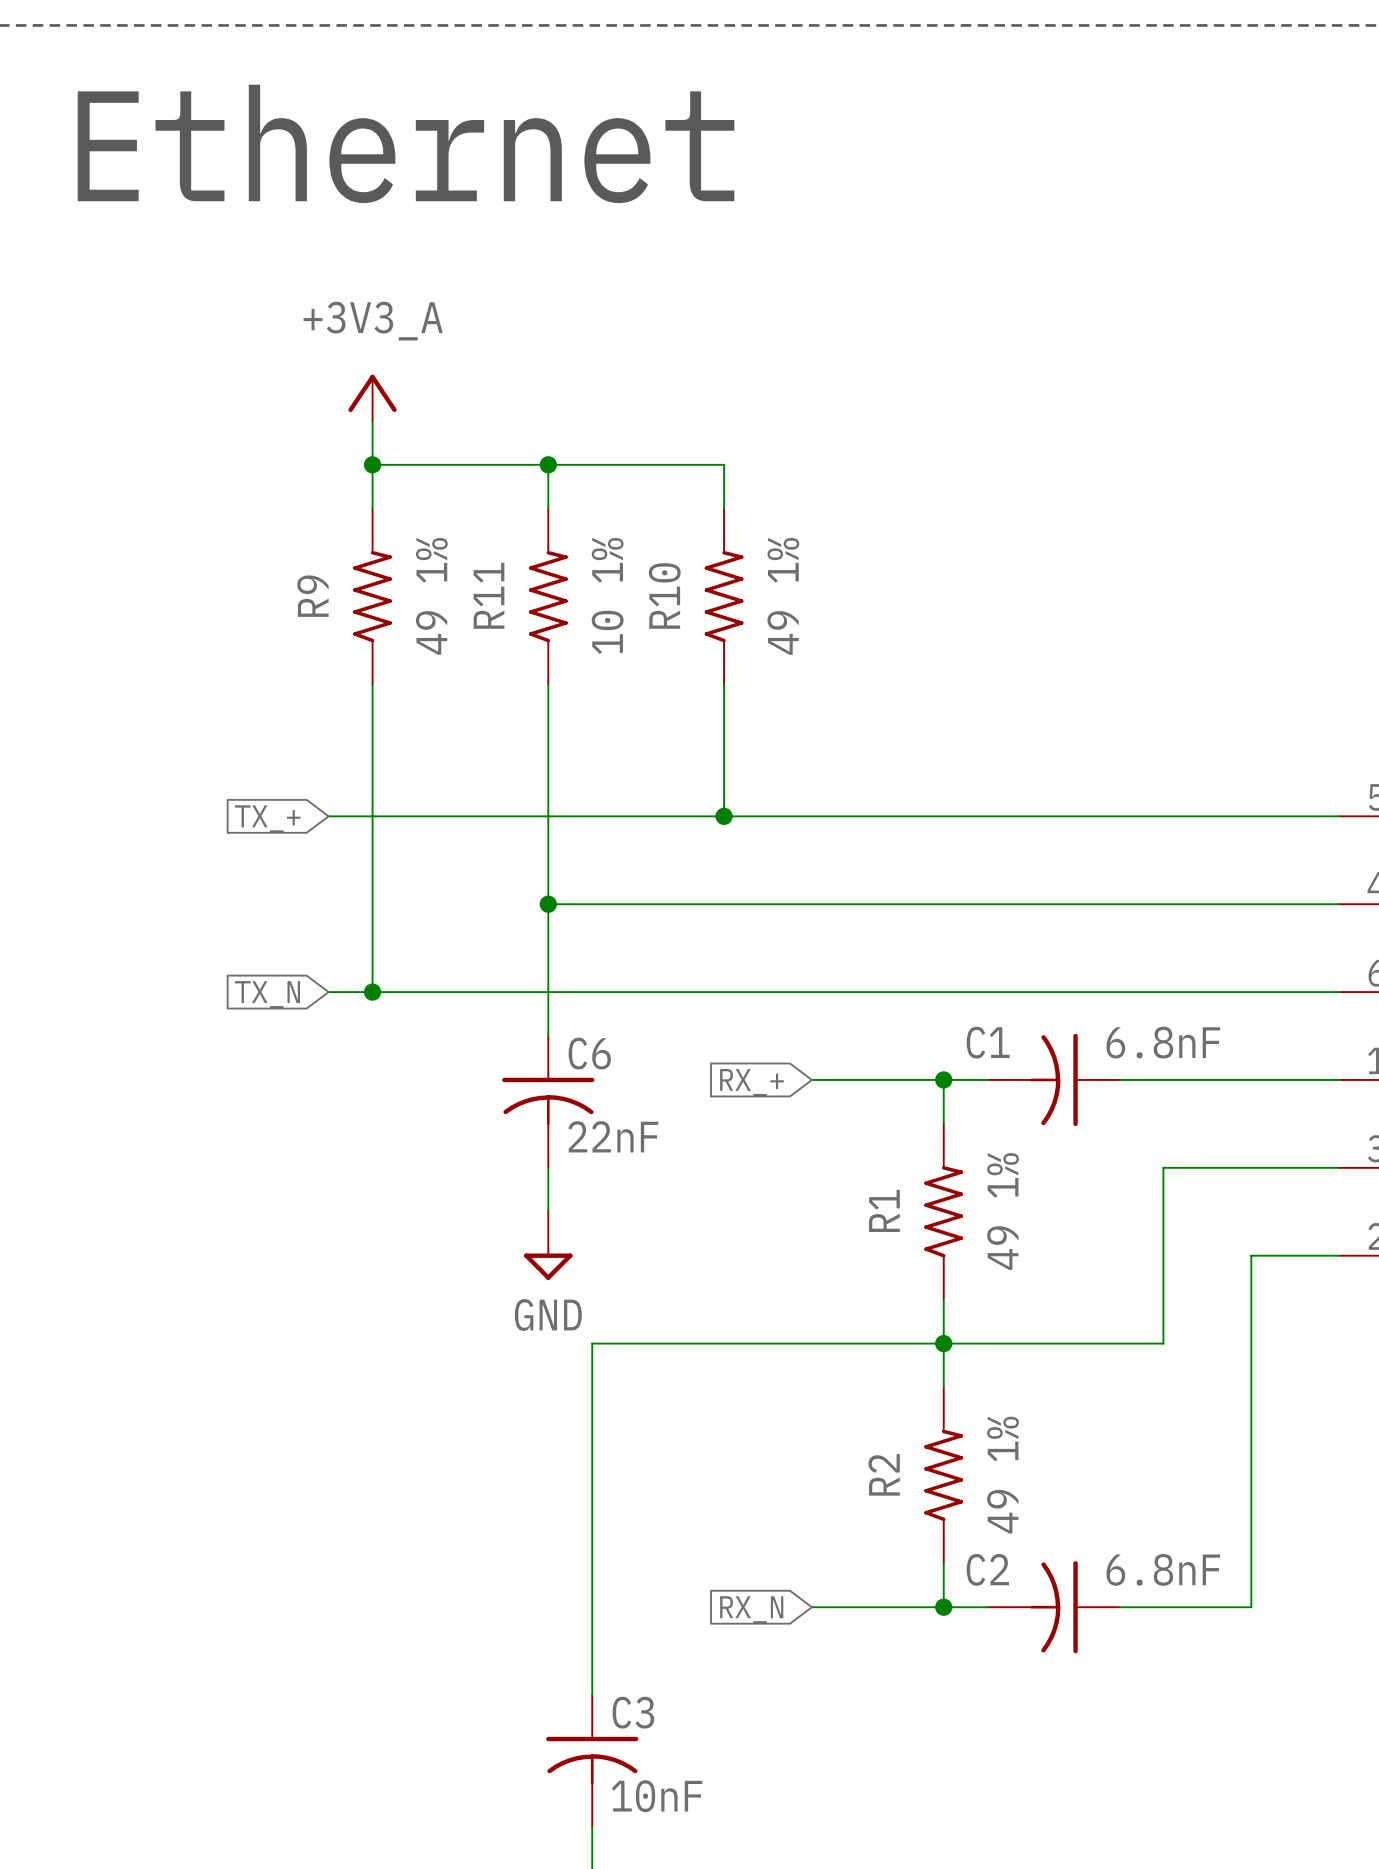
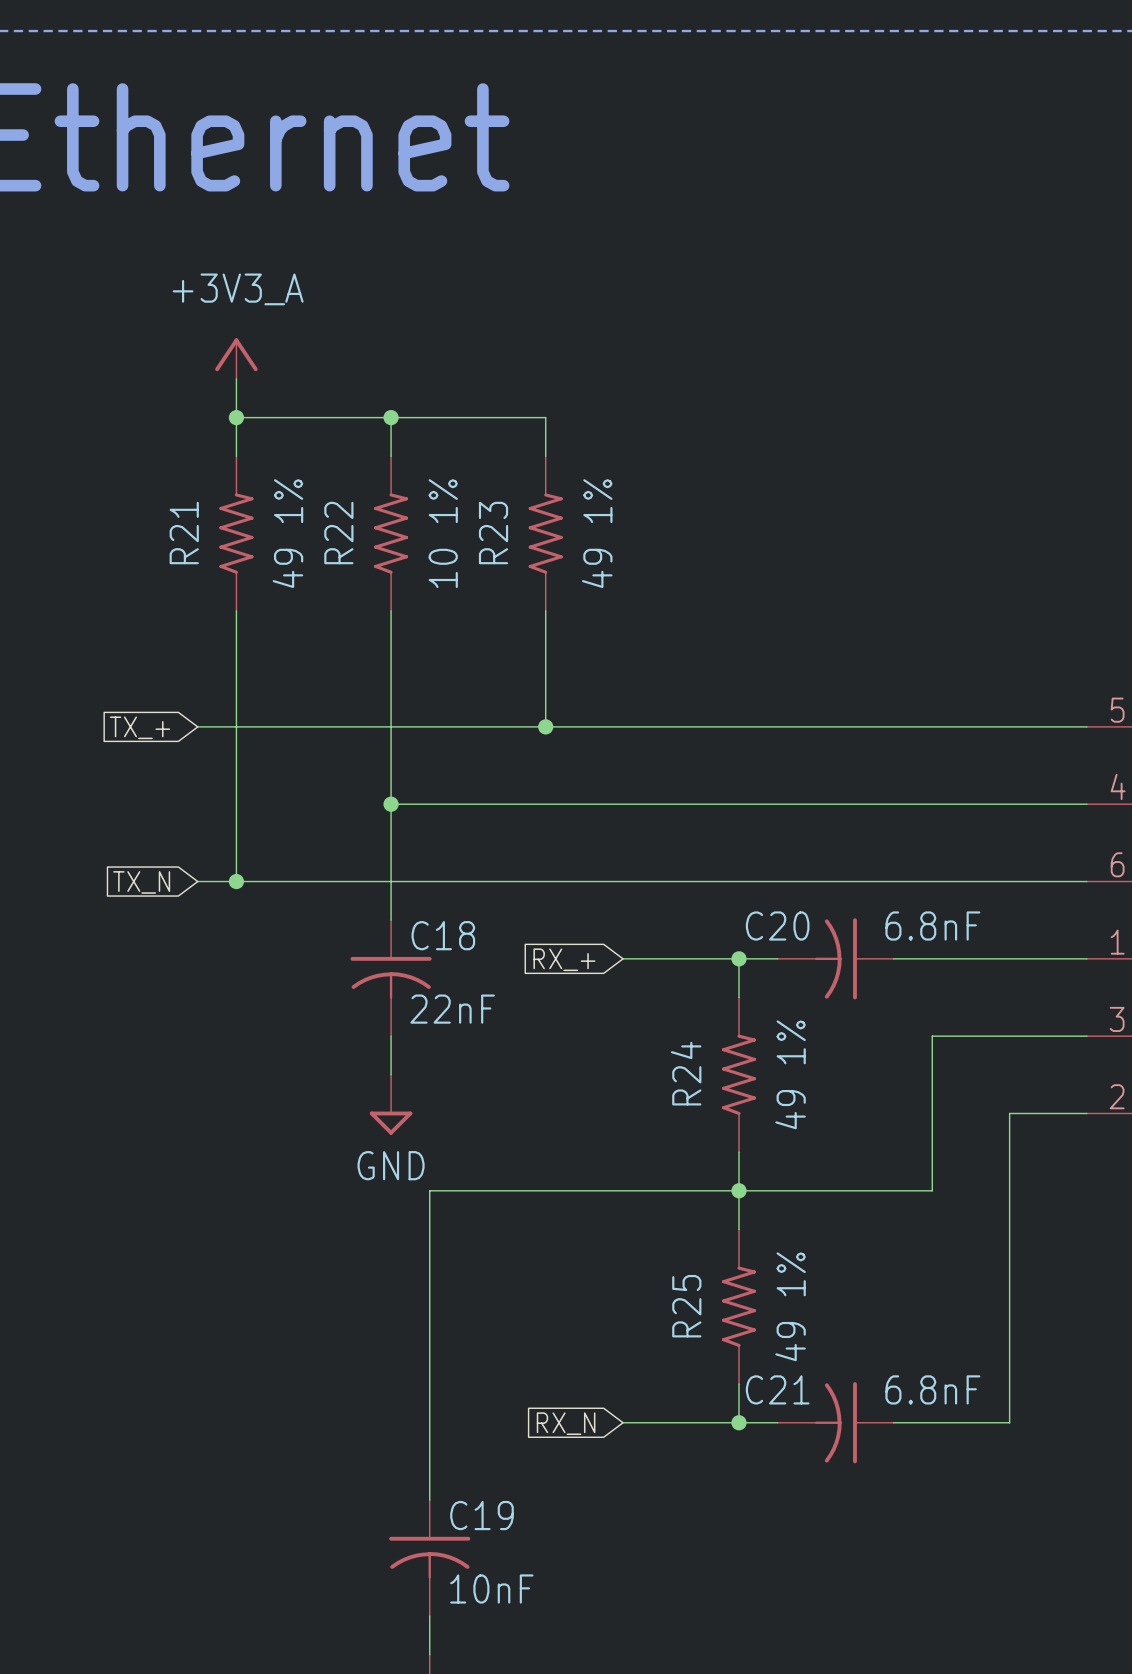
R11 name: R11 (488, 595) -> R22 (338, 533)
R10 name: R10 (664, 595) -> R23 (493, 533)
R9 name: R9 (312, 596) -> R21 (184, 533)
C1 name: C1 (988, 1042) -> C20 (777, 925)
C6 name: C6 (589, 1053) -> C18 (443, 935)
R1 name: R1 (884, 1210) -> R24 (686, 1073)
R2 name: R2 (884, 1474) -> R25 (686, 1306)
C2 name: C2 (987, 1569) -> C21 (777, 1389)
C3 name: C3 (633, 1712) -> C19 (481, 1515)

